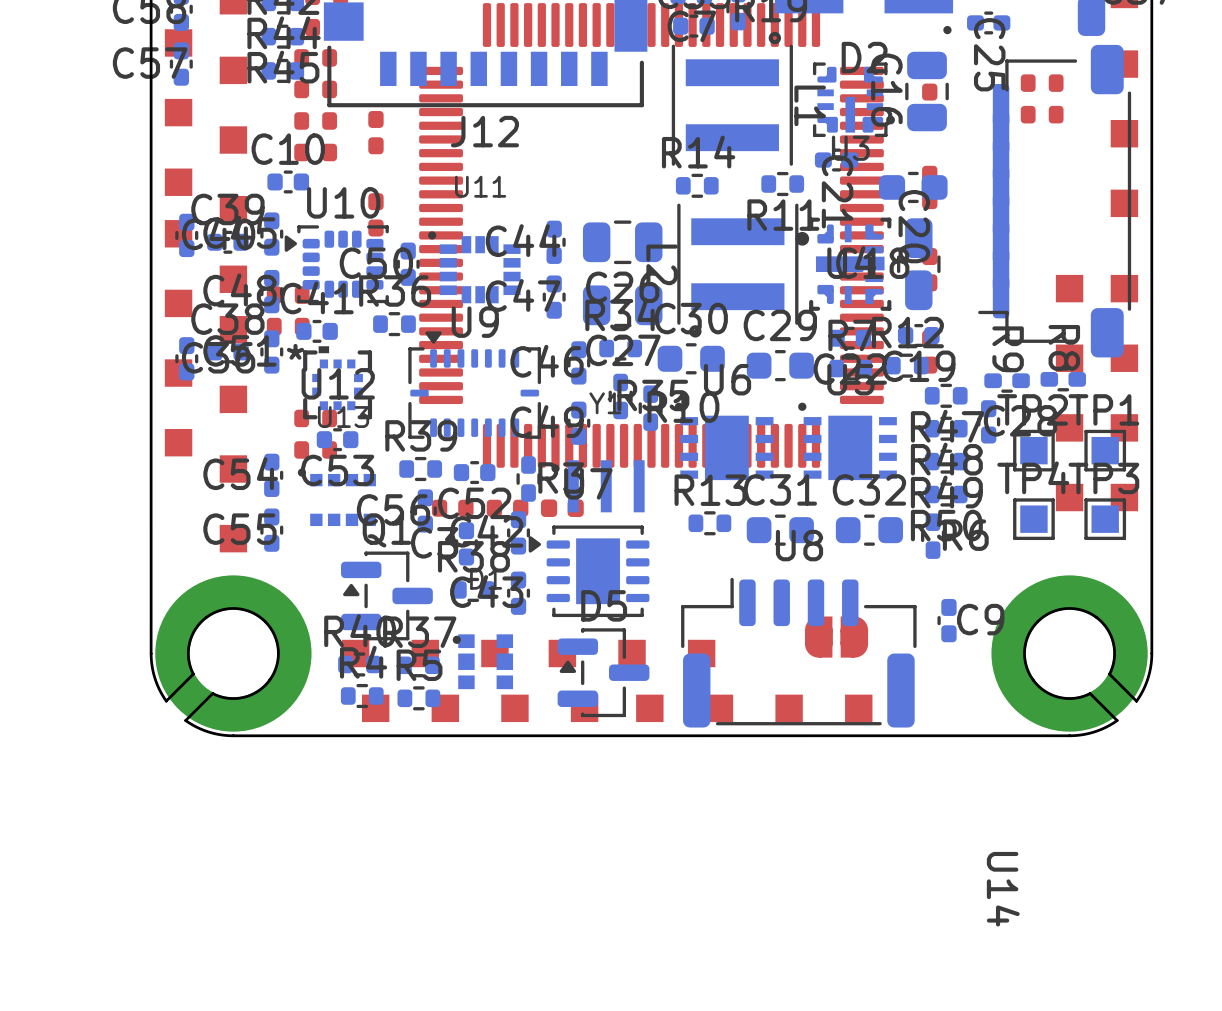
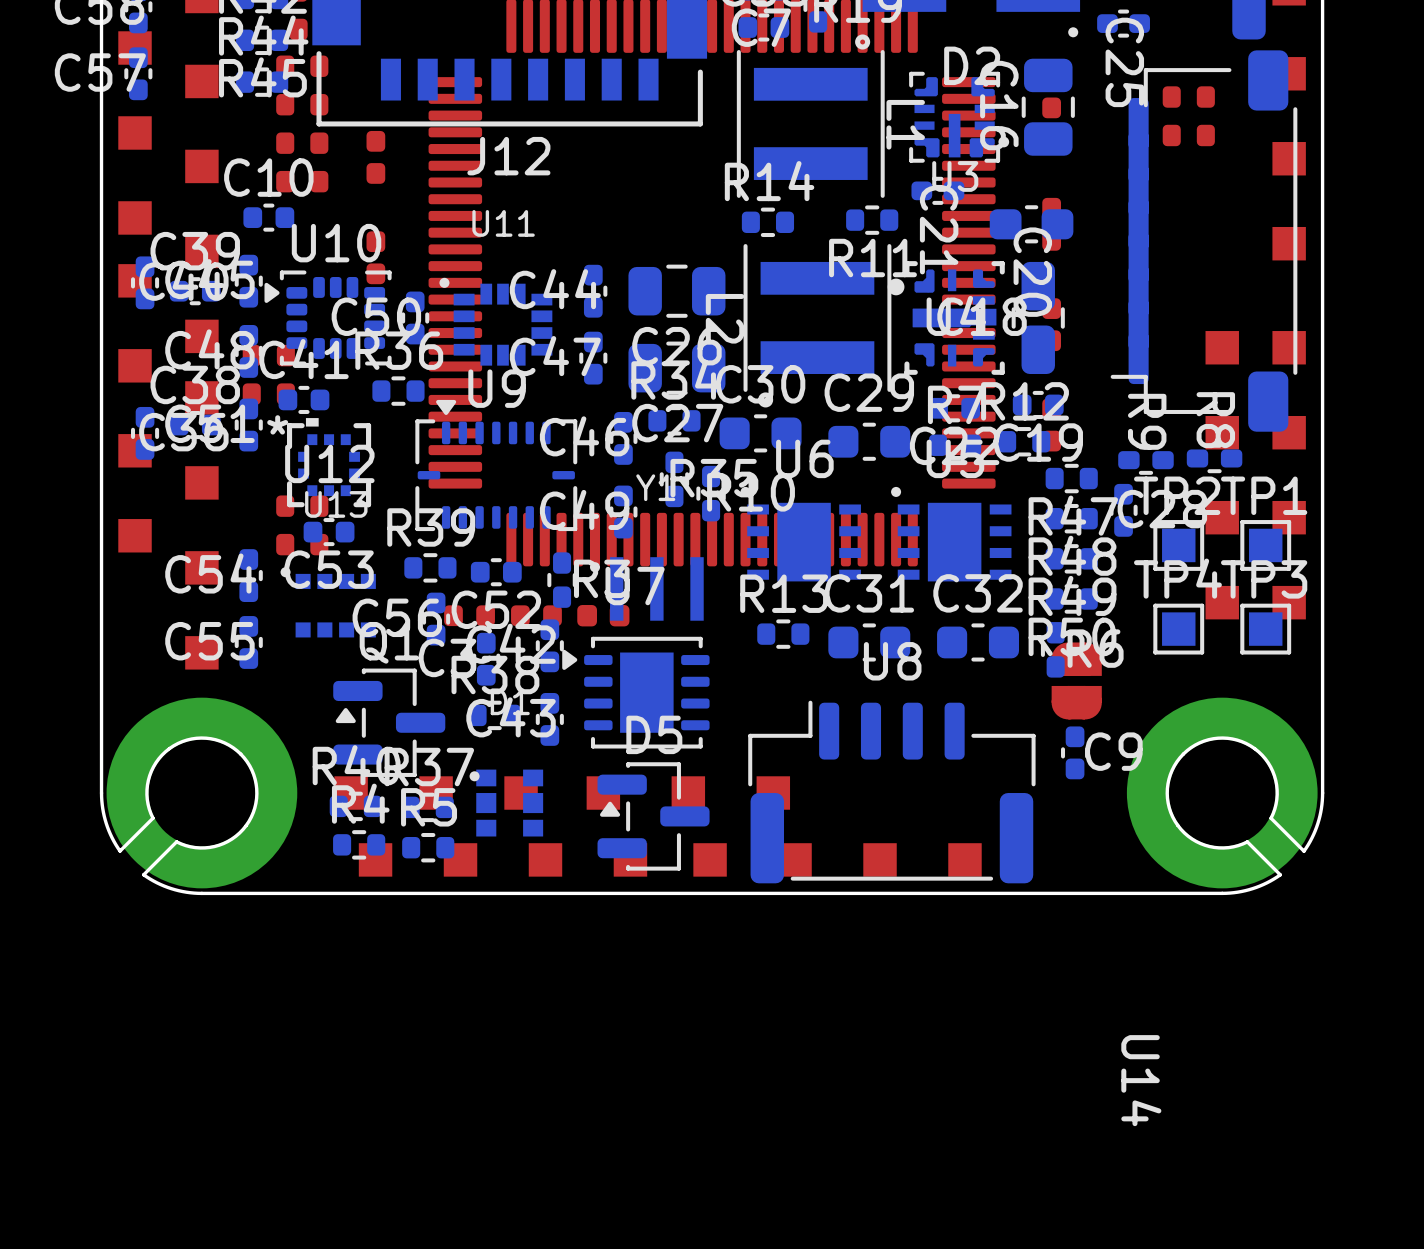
part rotation: 0° (836, 637) -> 90° clockwise (1076, 680)
part position: (836, 637) -> (1076, 680)

